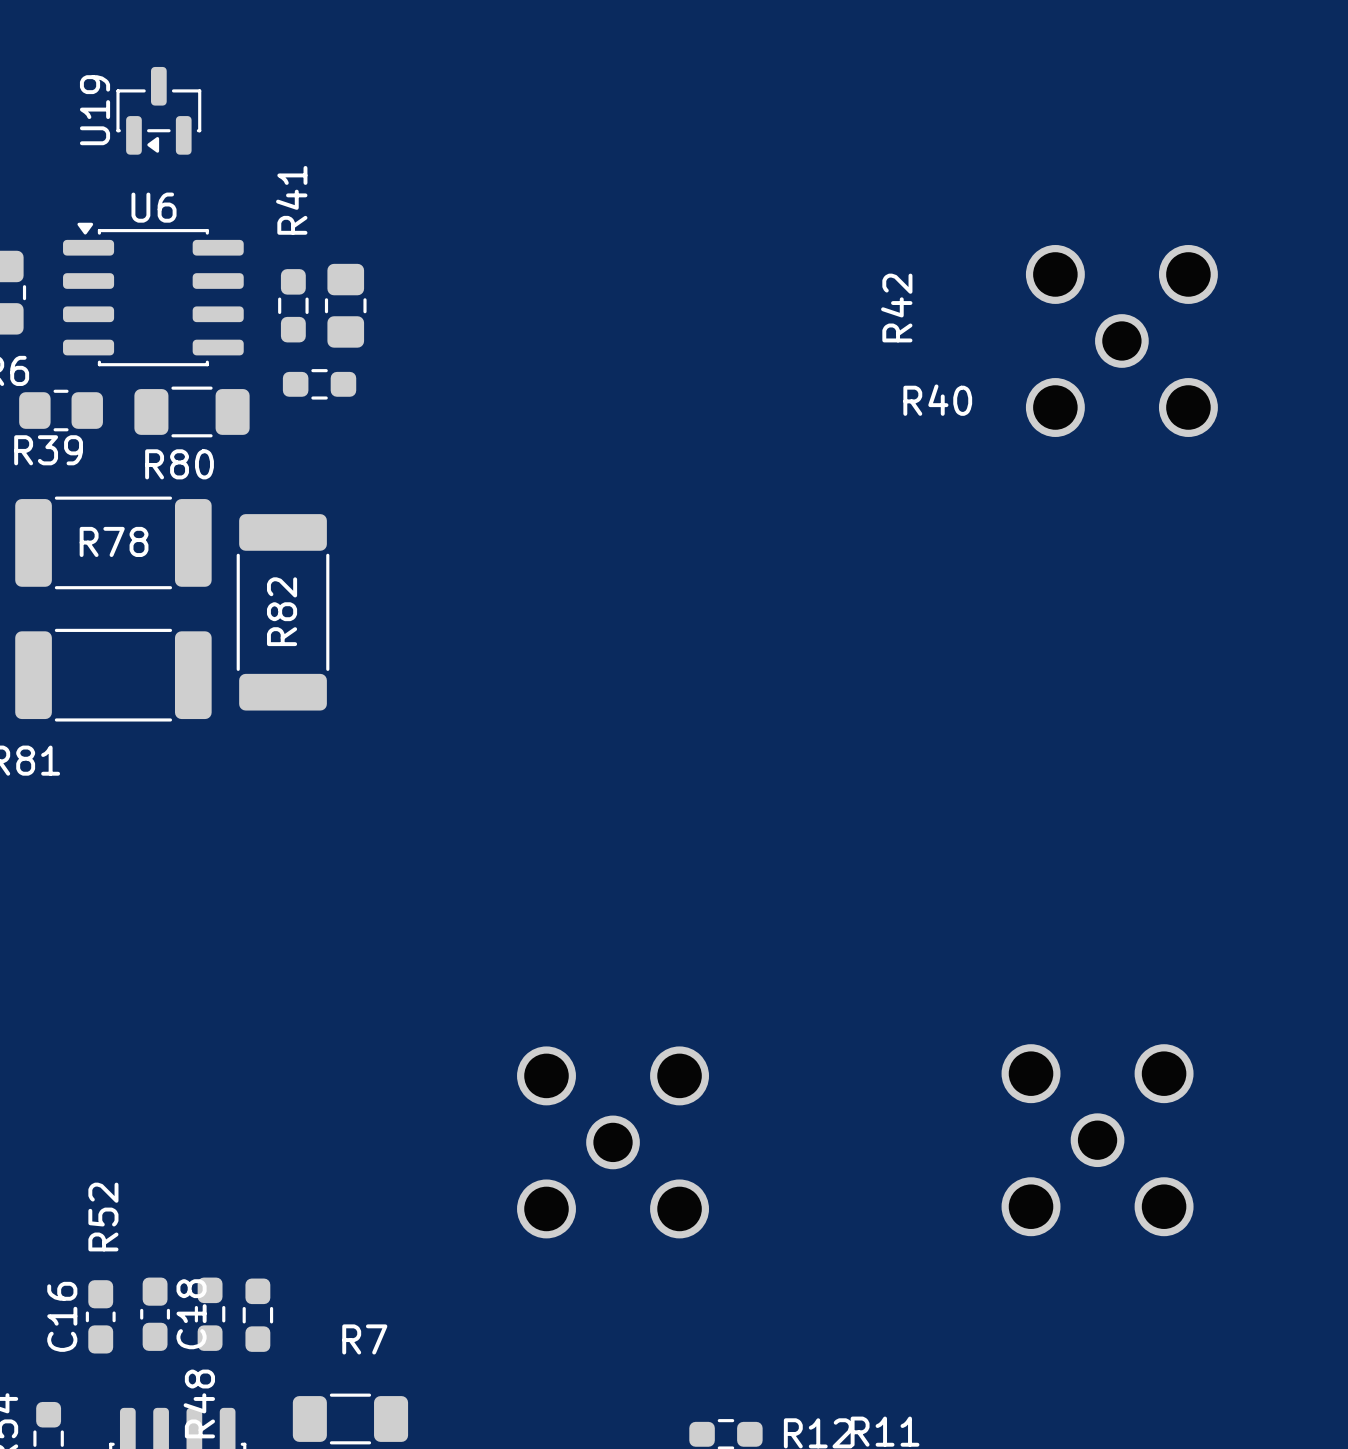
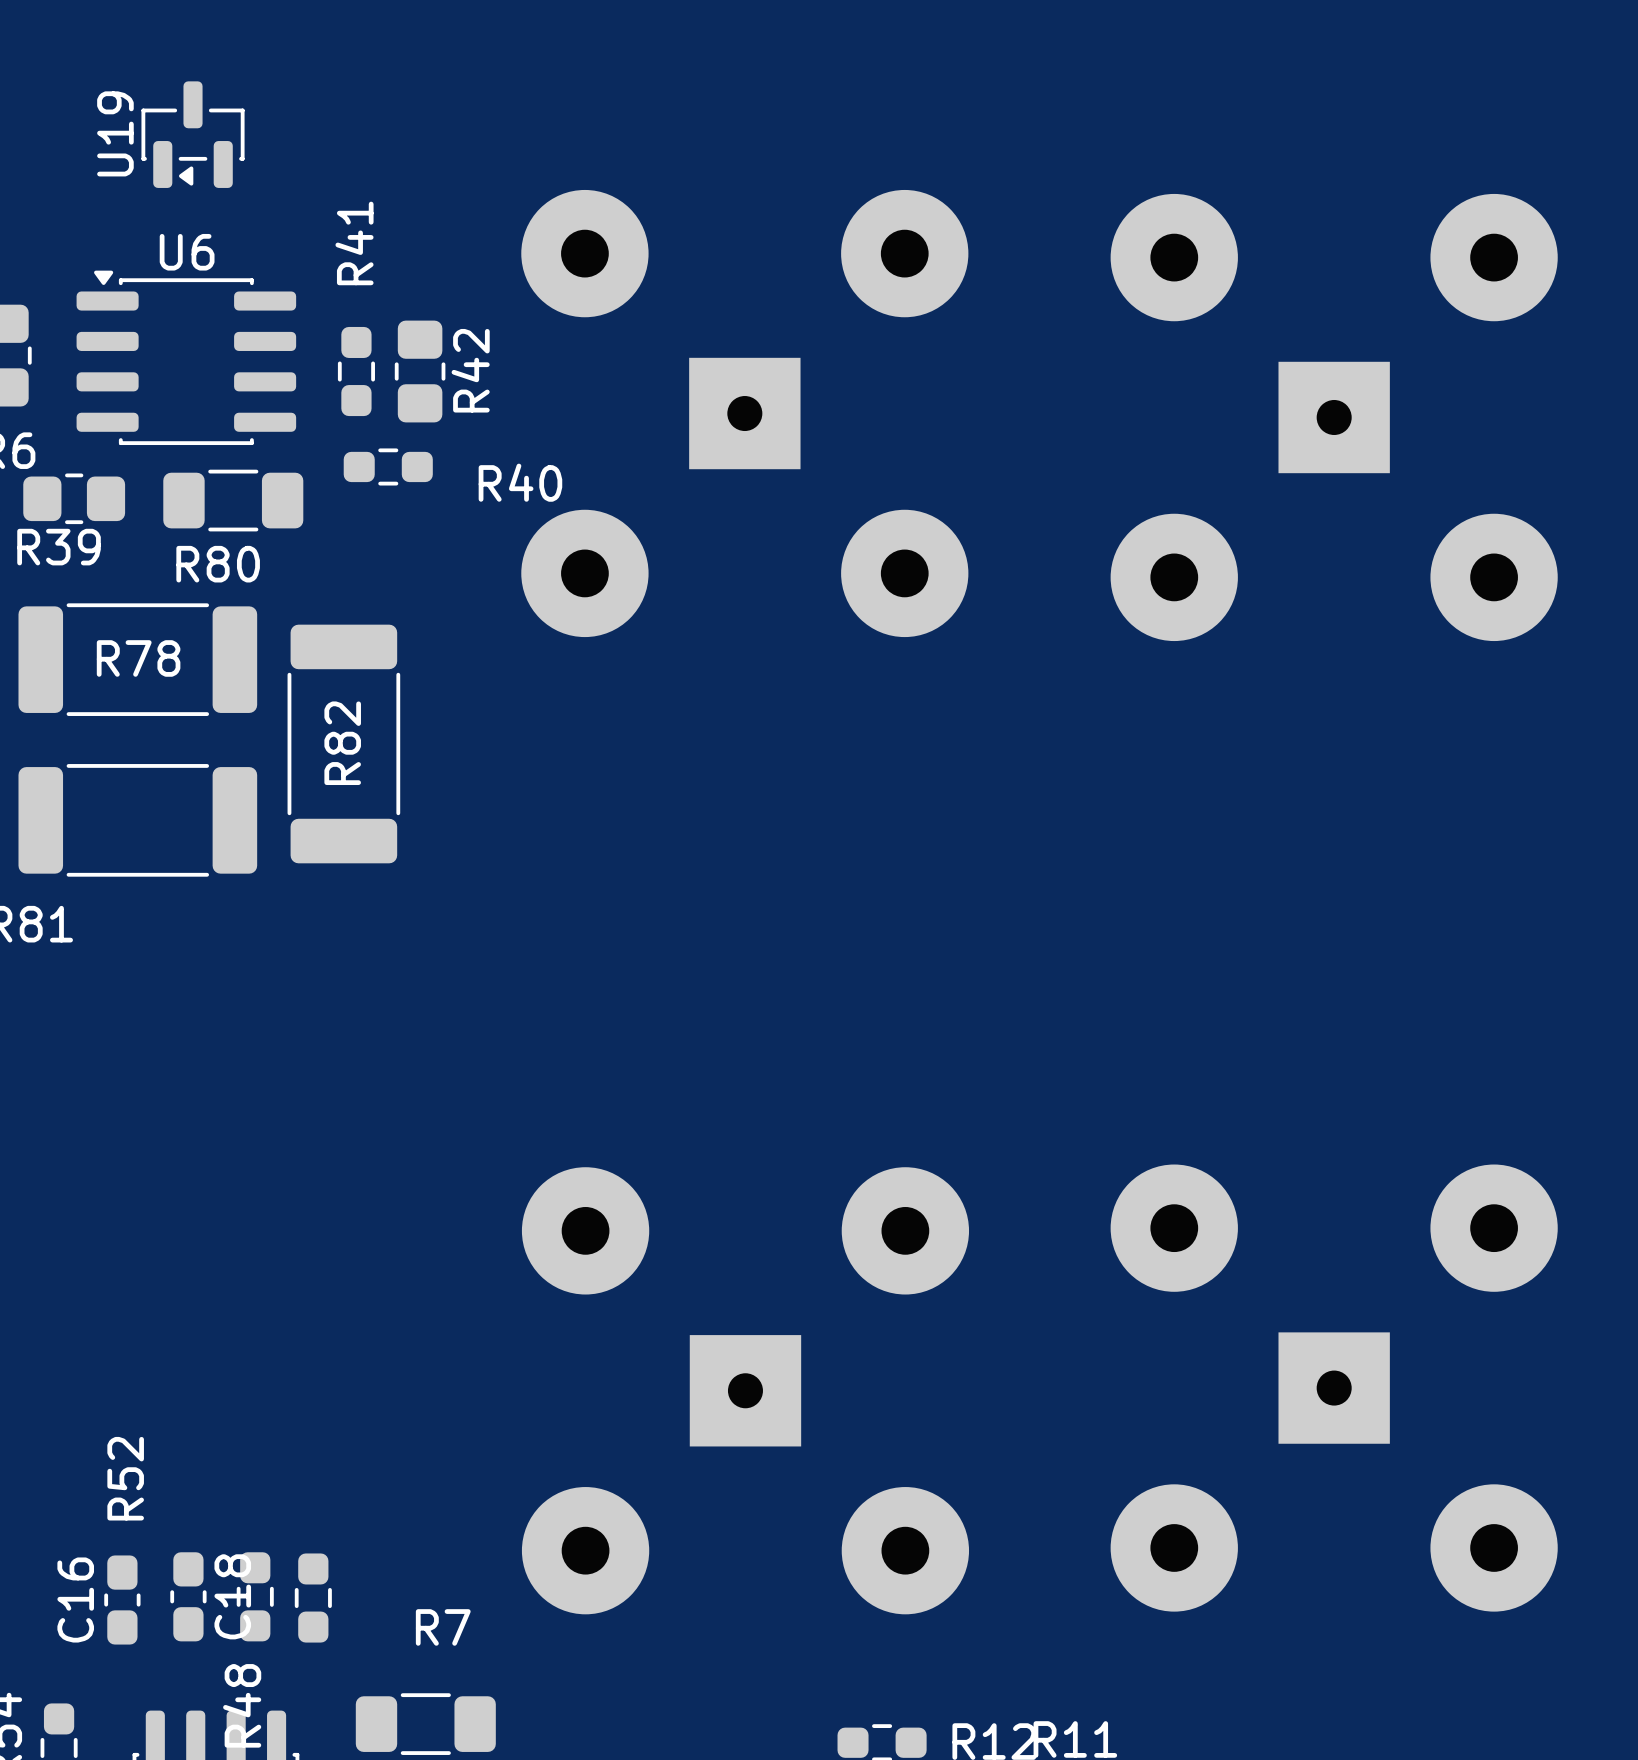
part footprint: [1025, 245, 1218, 437] -> [1110, 193, 1558, 642]
R42 name position: R42 (896, 308) -> R42 (470, 370)
part: none -> (744, 413)
R40 name position: R40 (937, 400) -> R40 (520, 482)
part footprint: [1001, 1044, 1194, 1237] -> [1110, 1164, 1558, 1612]
part footprint: [517, 1046, 710, 1239] -> [521, 1167, 970, 1615]

